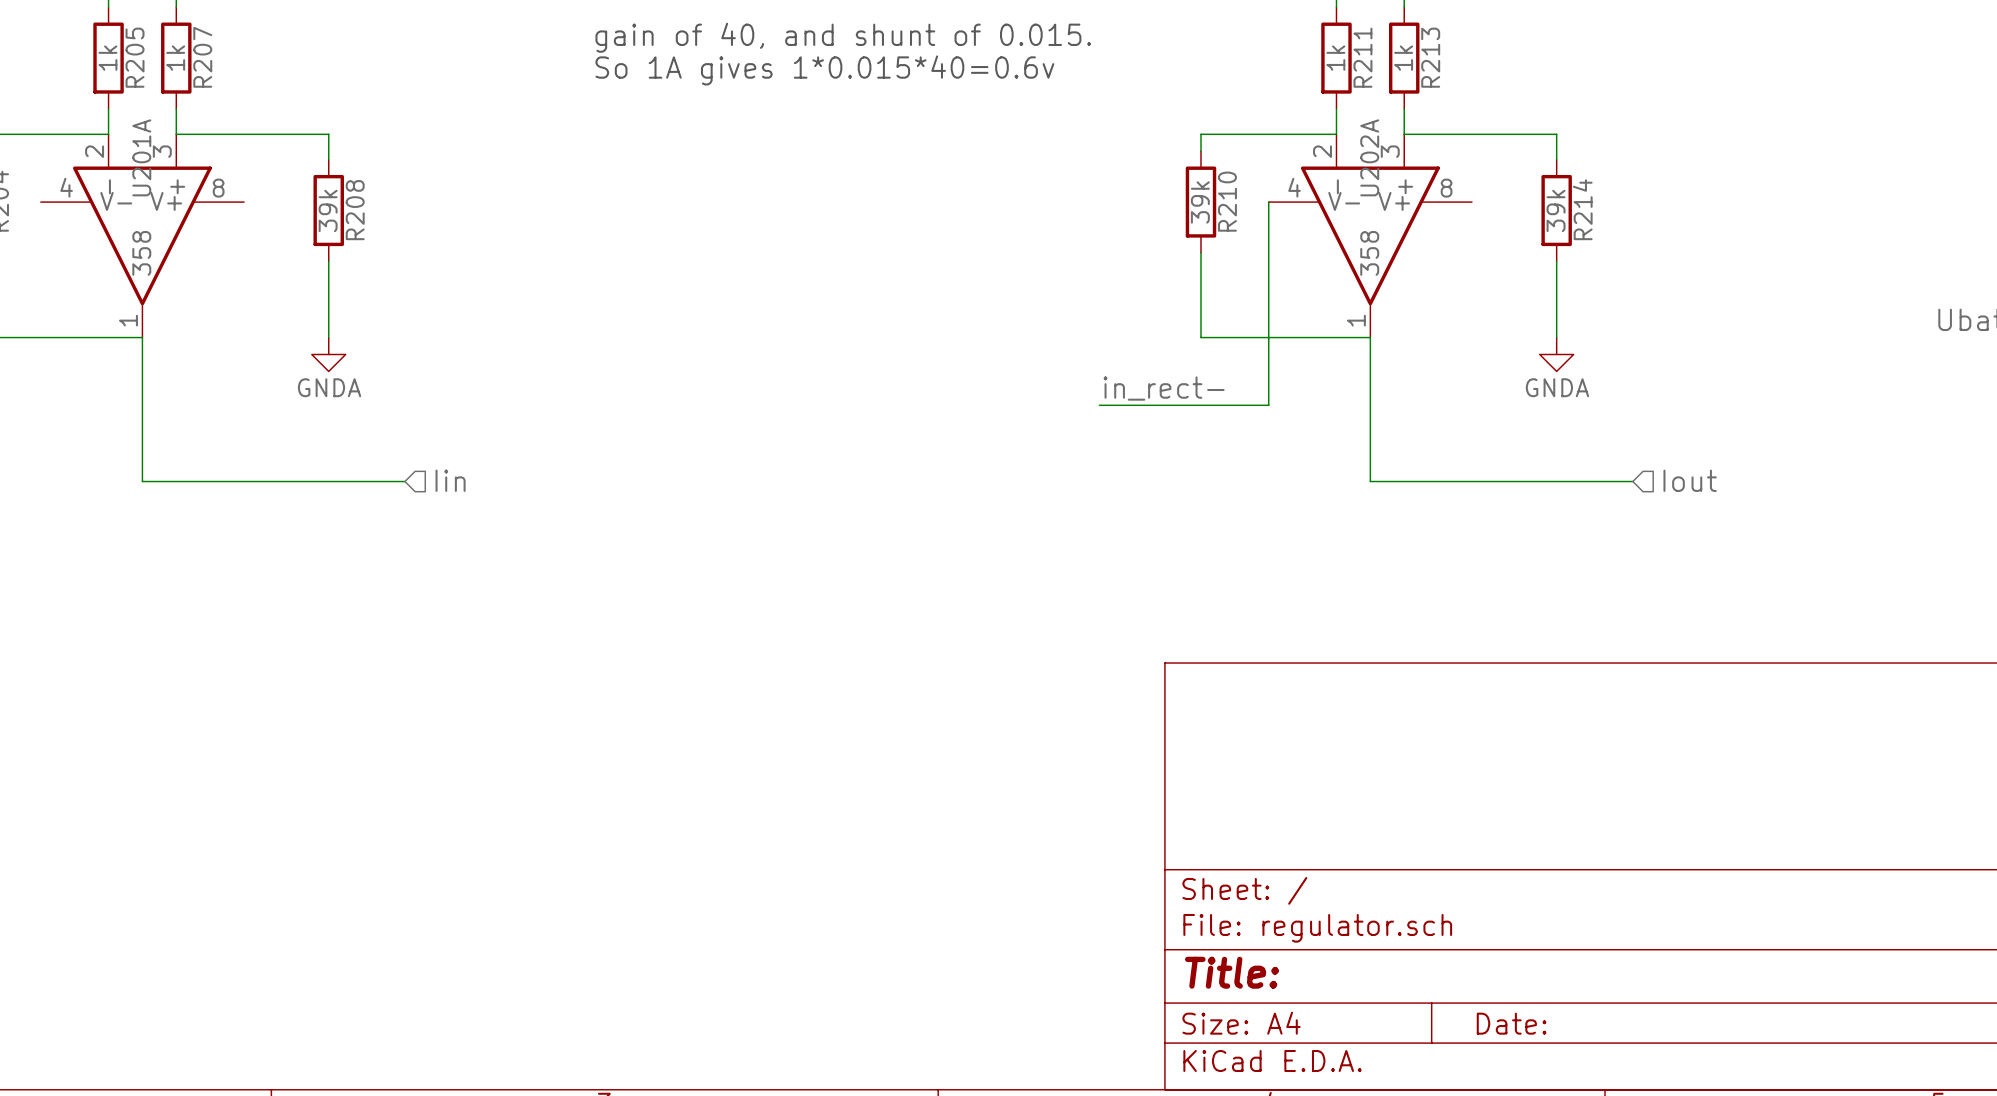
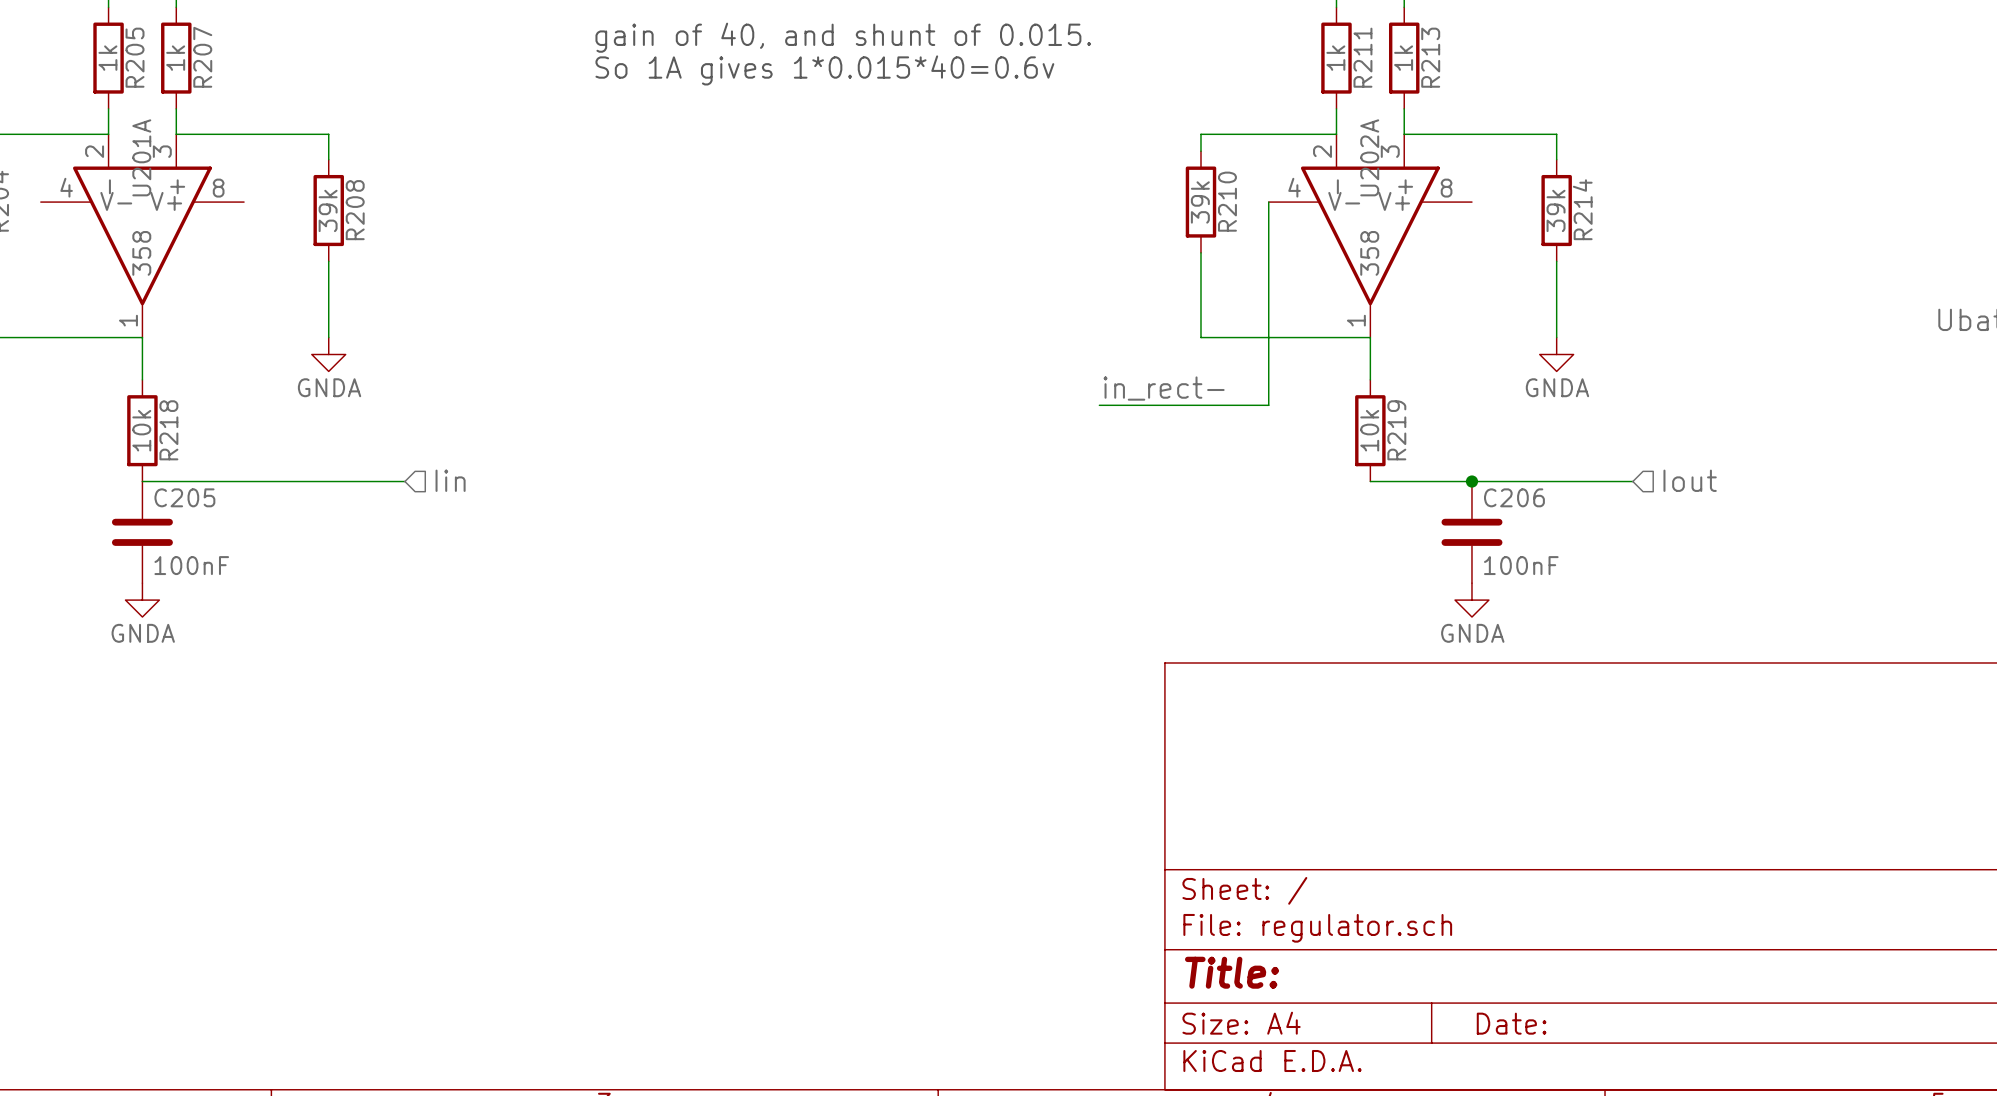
wire: (142, 379) (142, 481) -> none
wire: (1370, 379) (1370, 481) -> none
R218: none -> 10k (142, 430)
R219: none -> 10k (1370, 430)
junction: none -> (1471, 481)
C205: none -> 100nF (142, 532)
C206: none -> 100nF (1471, 532)
power symbol: none -> GNDA (142, 600)
power symbol: none -> GNDA (1471, 600)

